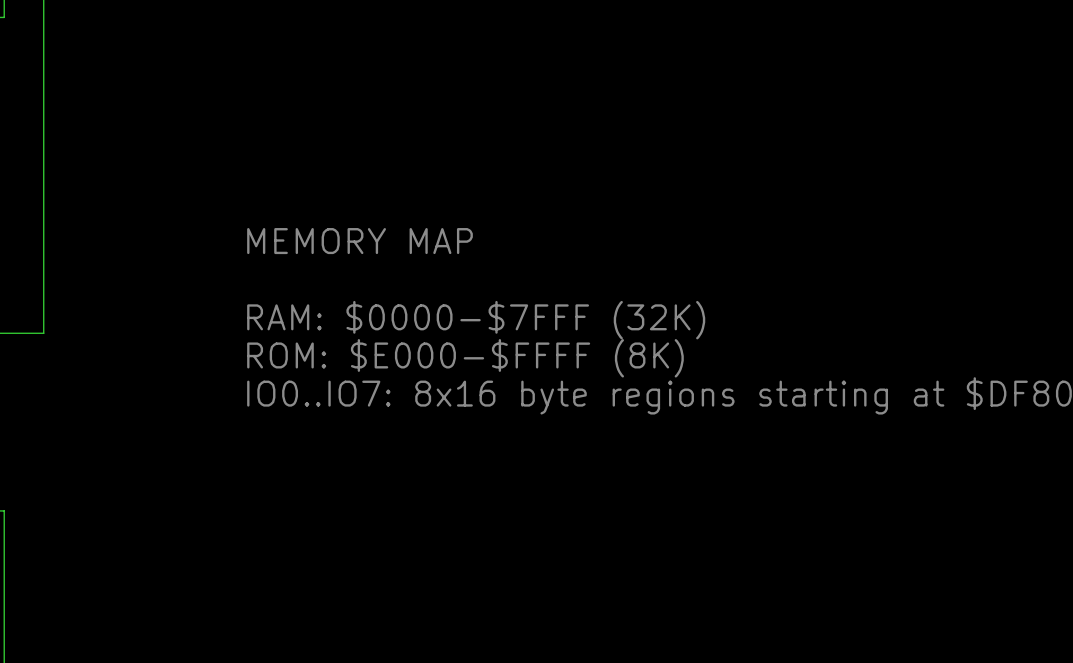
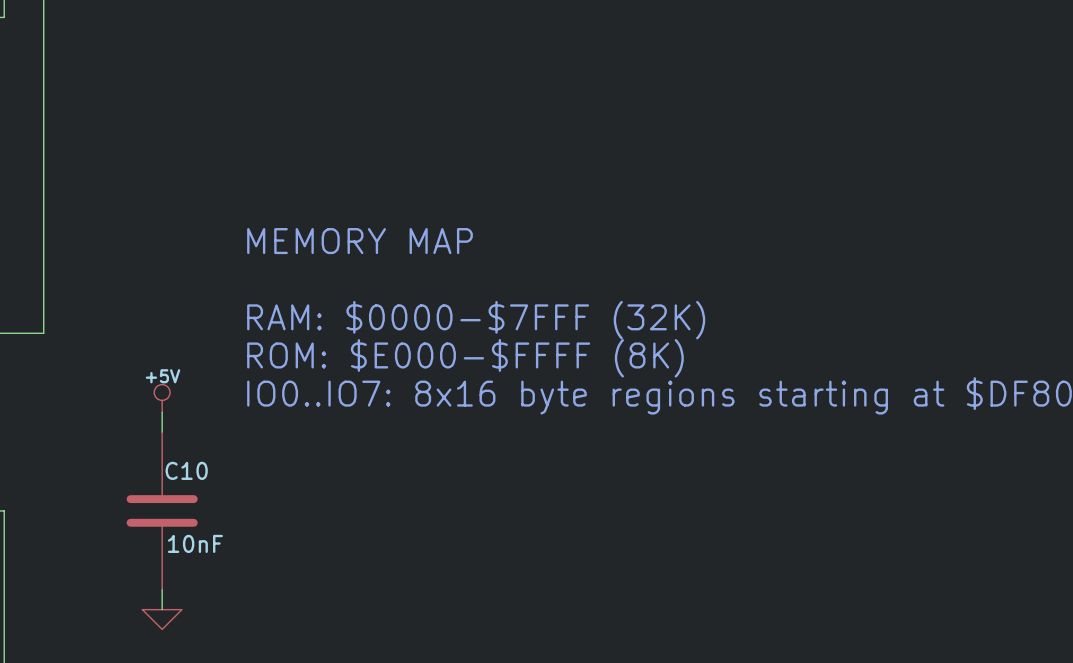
power symbol: none -> +5V (162, 398)
wire: none -> (162, 412) (162, 431)
C10: none -> 10nF (162, 510)
wire: none -> (162, 589) (162, 609)
power symbol: none -> (162, 619)

